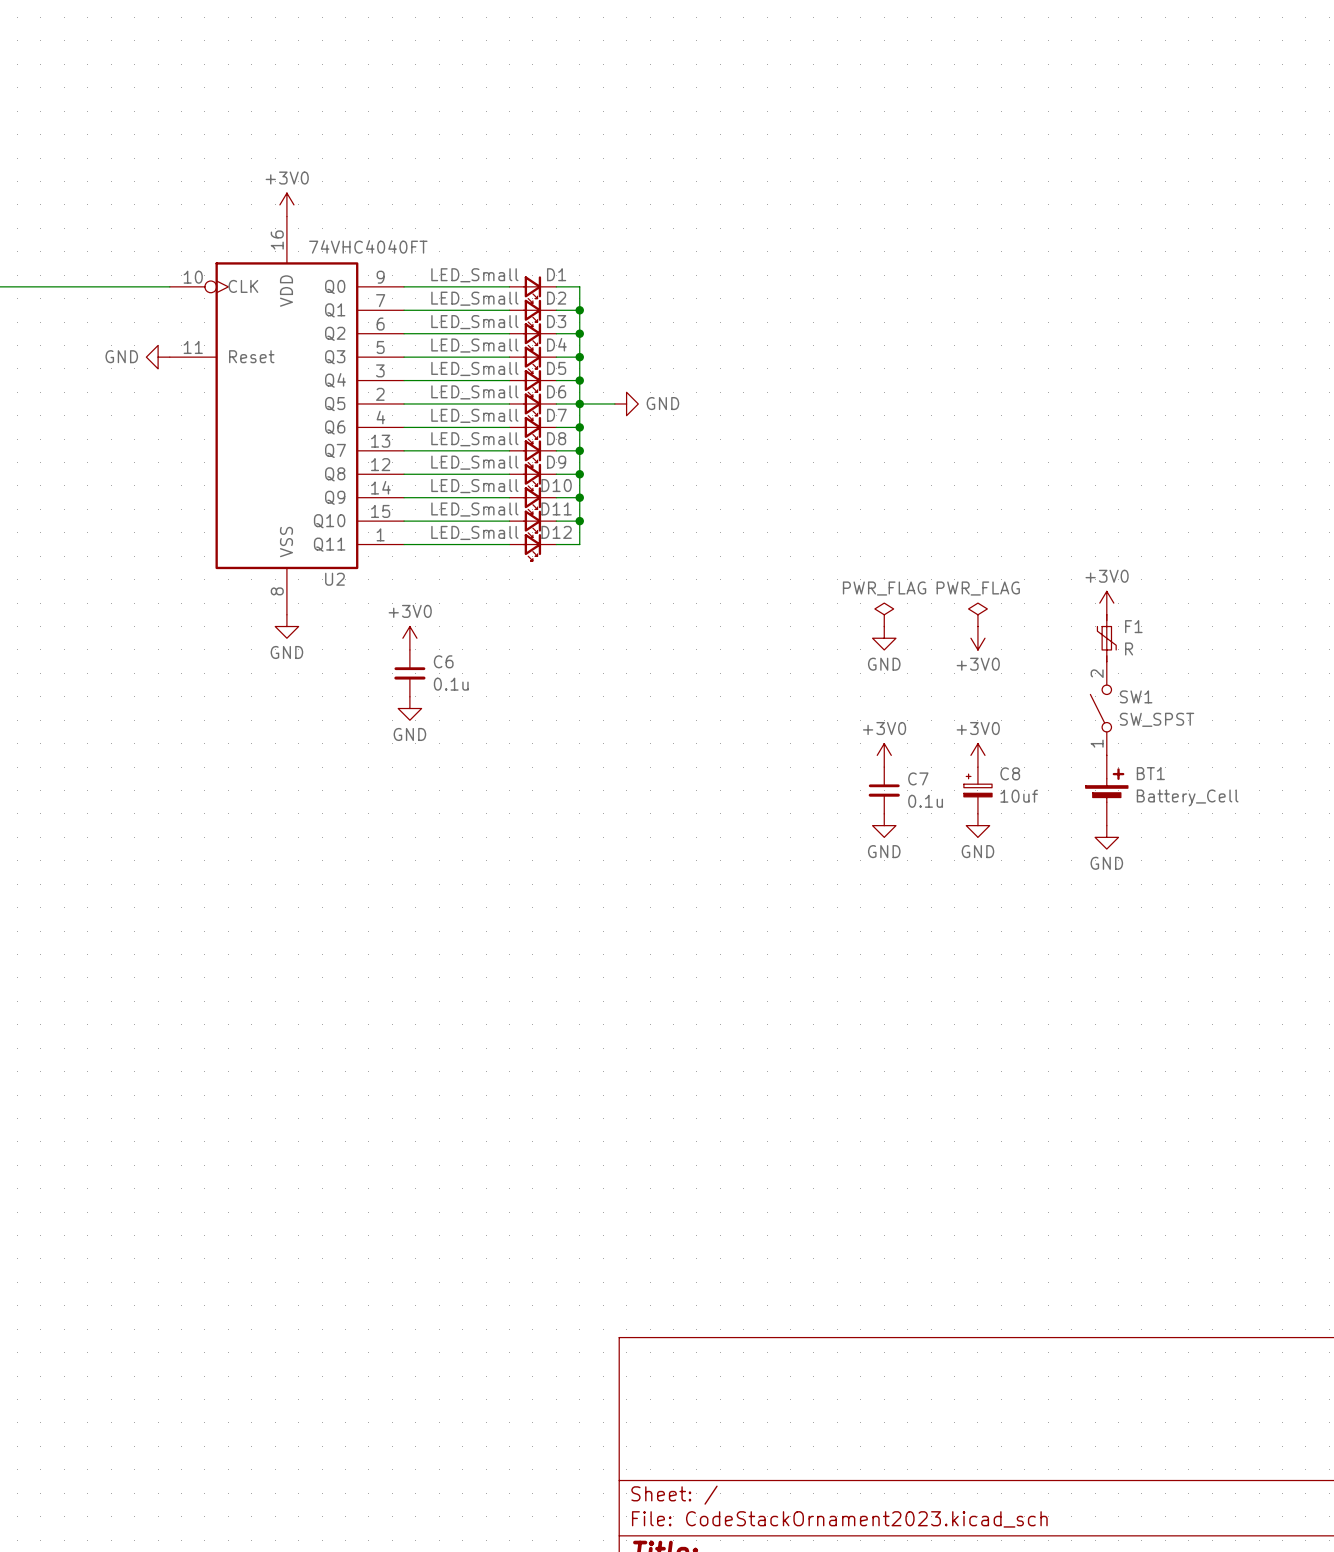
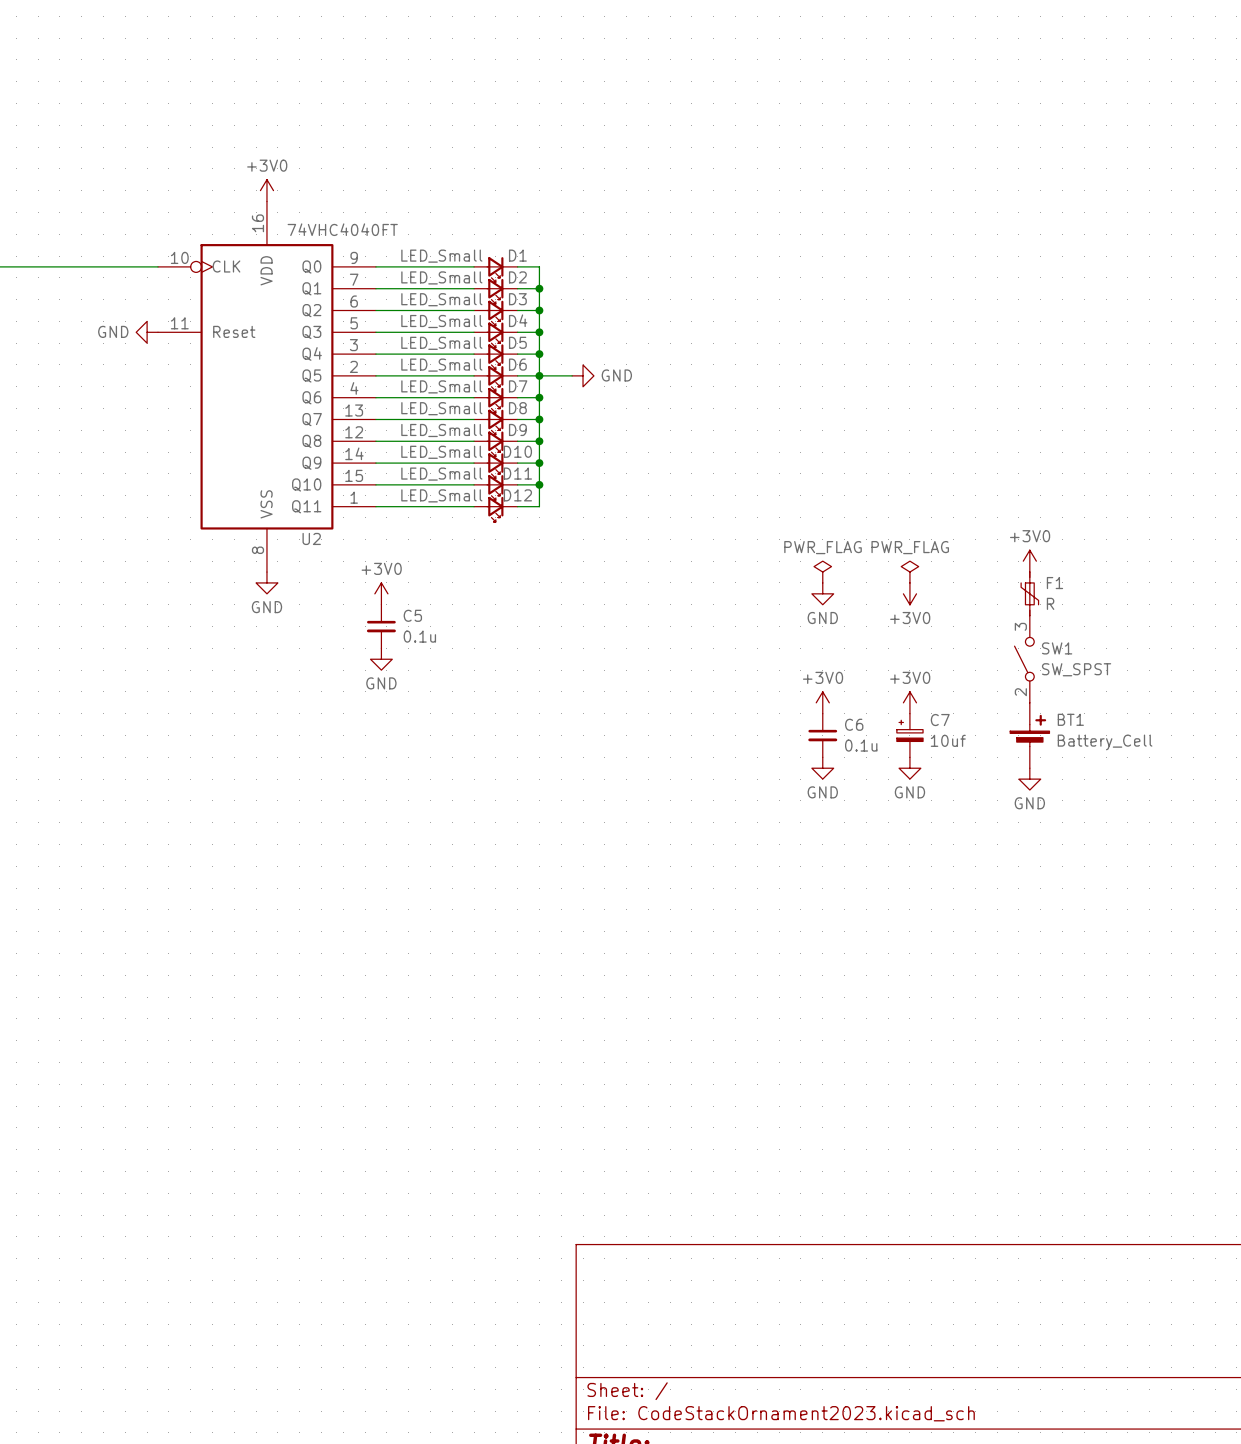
C6 name: C6 (443, 661) -> C5 (412, 615)
SW1 pin number: 2 (1097, 673) -> 3 (1020, 626)
SW1 pin number: 1 (1097, 743) -> 2 (1020, 692)
C8 name: C8 (1010, 773) -> C7 (940, 720)
C7 name: C7 (918, 778) -> C6 (854, 724)

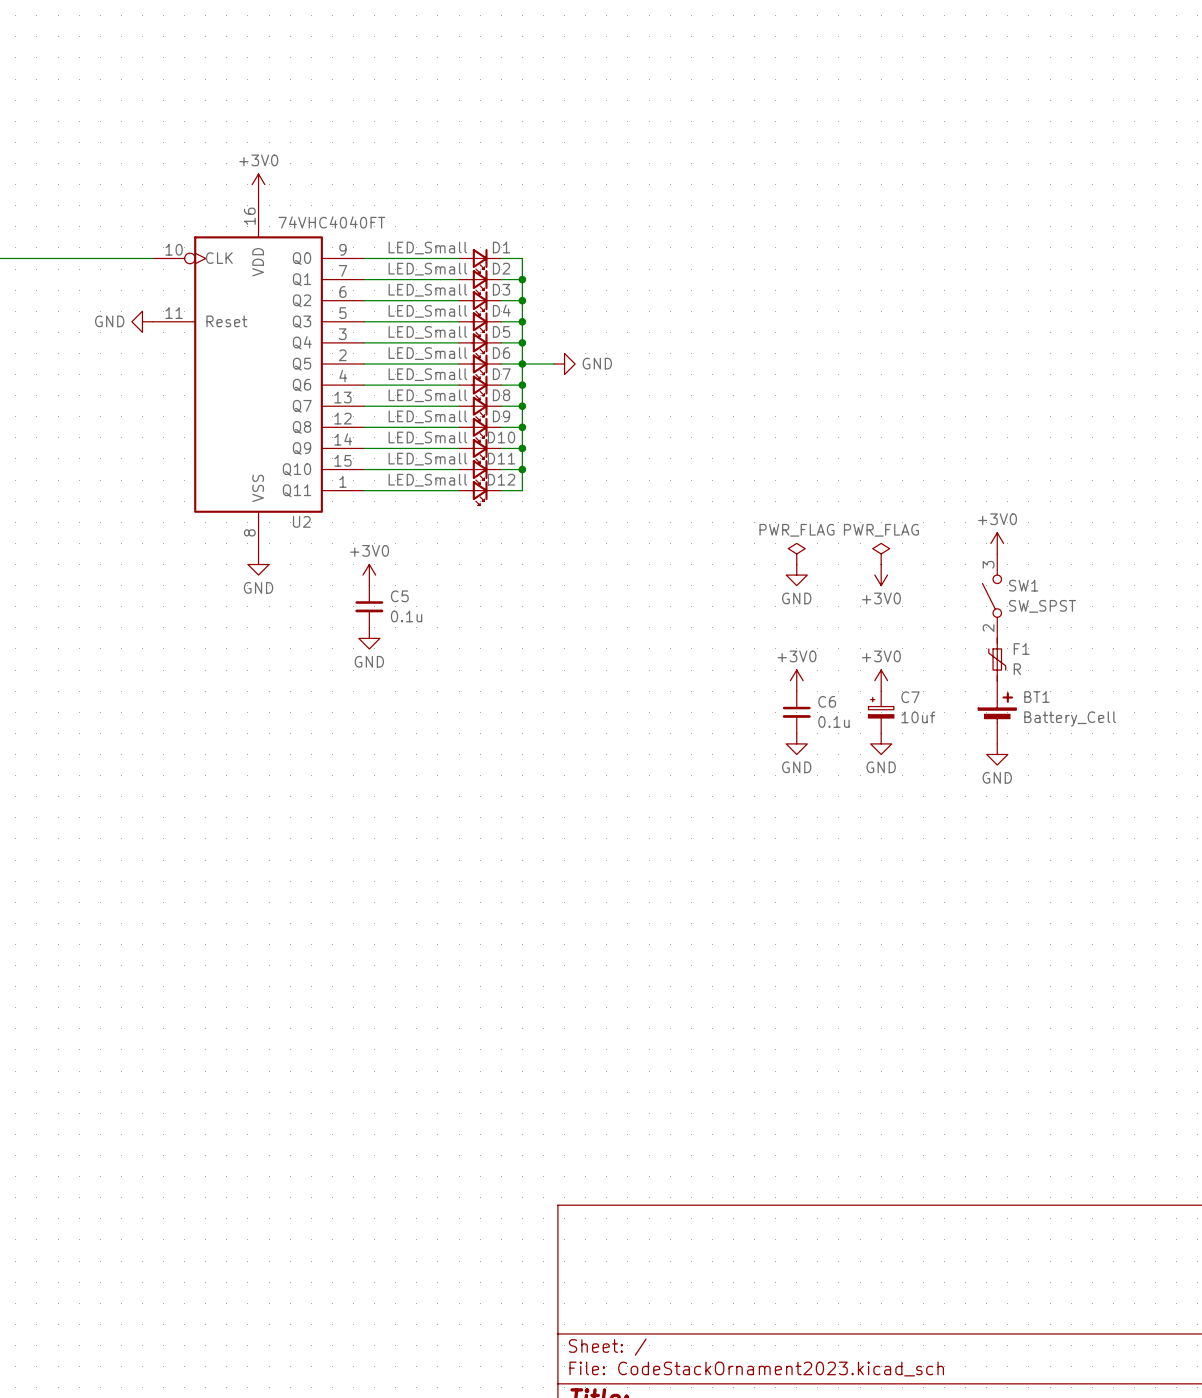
F1 position: (1029, 593) -> (997, 659)
SW1 position: (1024, 659) -> (991, 596)

